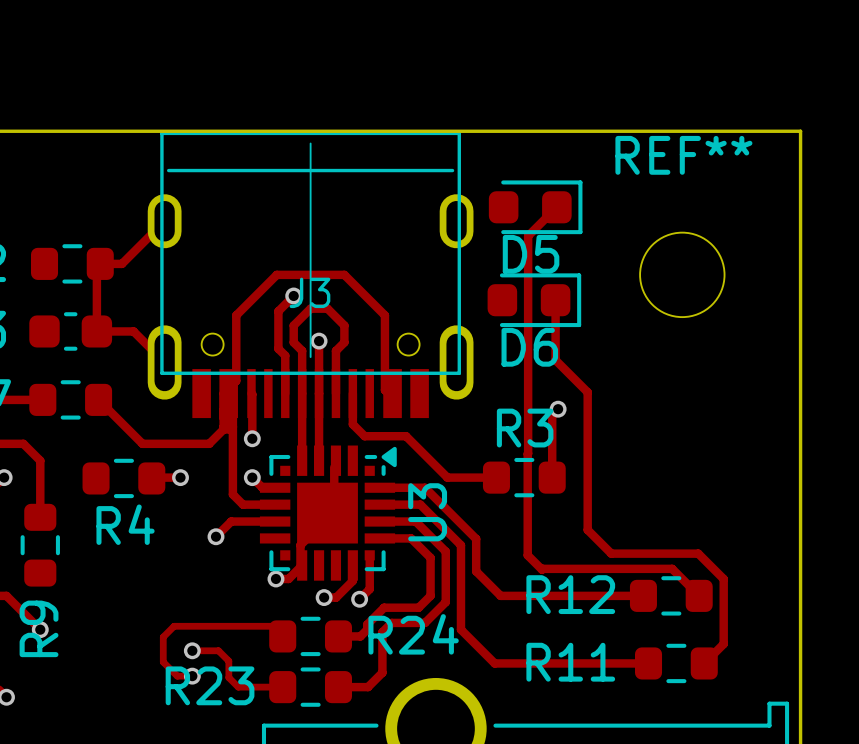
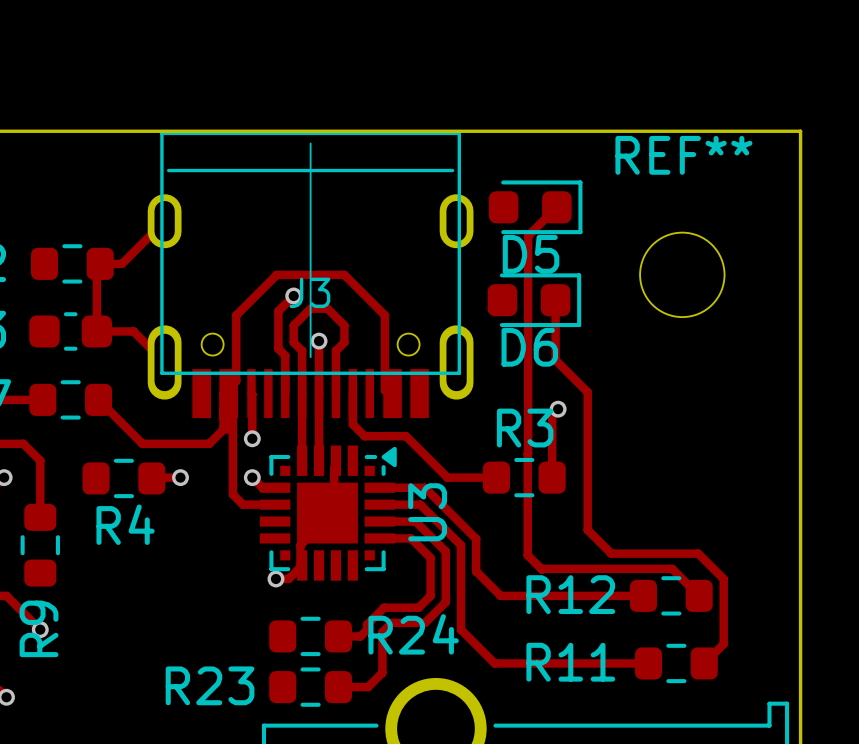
track: (275, 521) (231, 521) (216, 536) -> none
via: (216, 536) -> none
track: (369, 555) (369, 589) (359, 599) -> none
track: (352, 565) (352, 580) (336, 597) (324, 597) -> none
via: (324, 597) -> none
via: (359, 599) -> none
track: (282, 636) (272, 626) (174, 626) (163, 637) (163, 662) (177, 676) (192, 676) -> none
track: (192, 650) (218, 650) (228, 661) (228, 677) (238, 687) (282, 687) -> none
via: (192, 650) -> none
via: (192, 676) -> none

